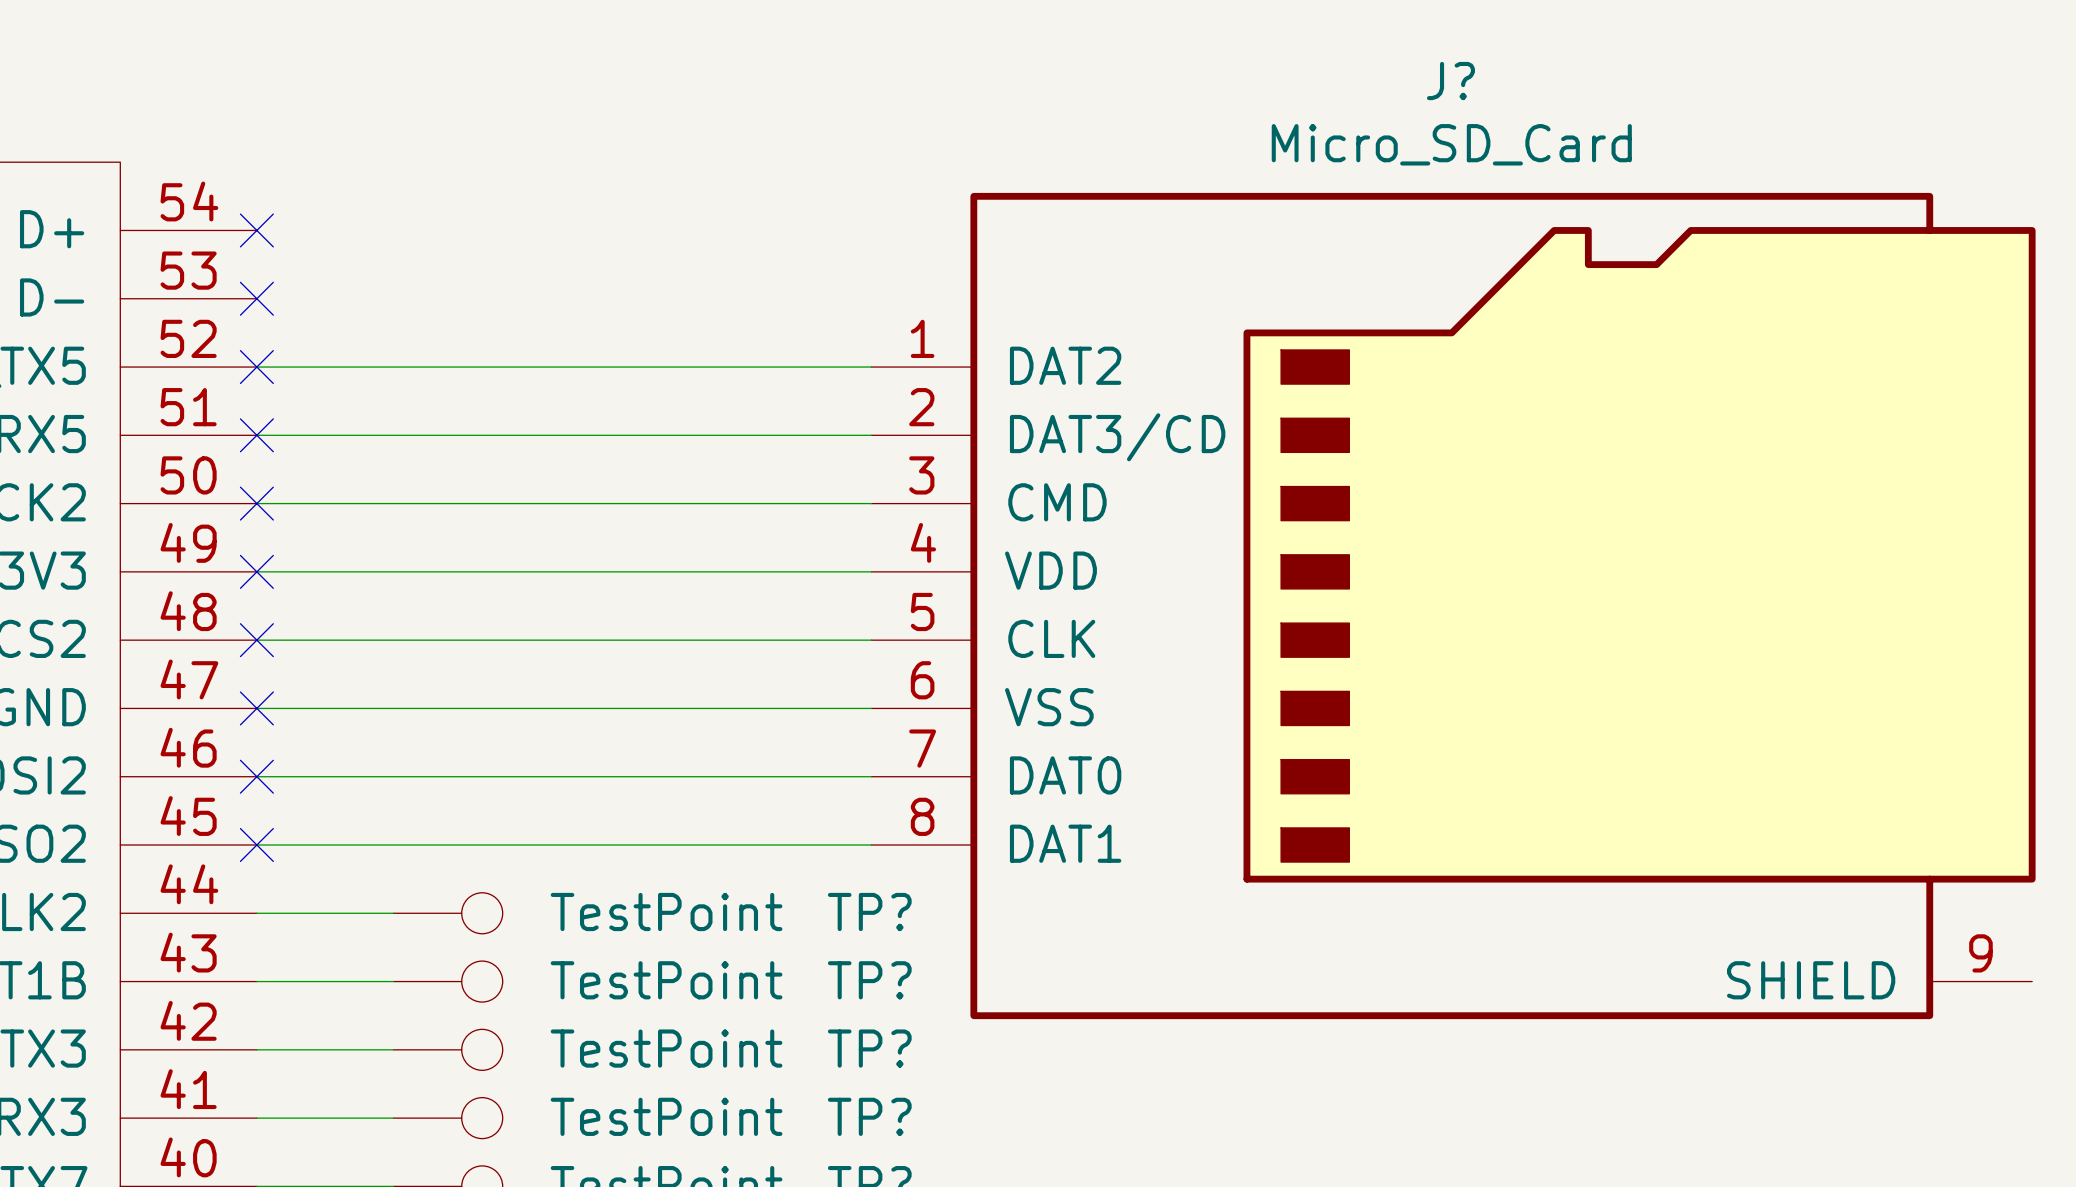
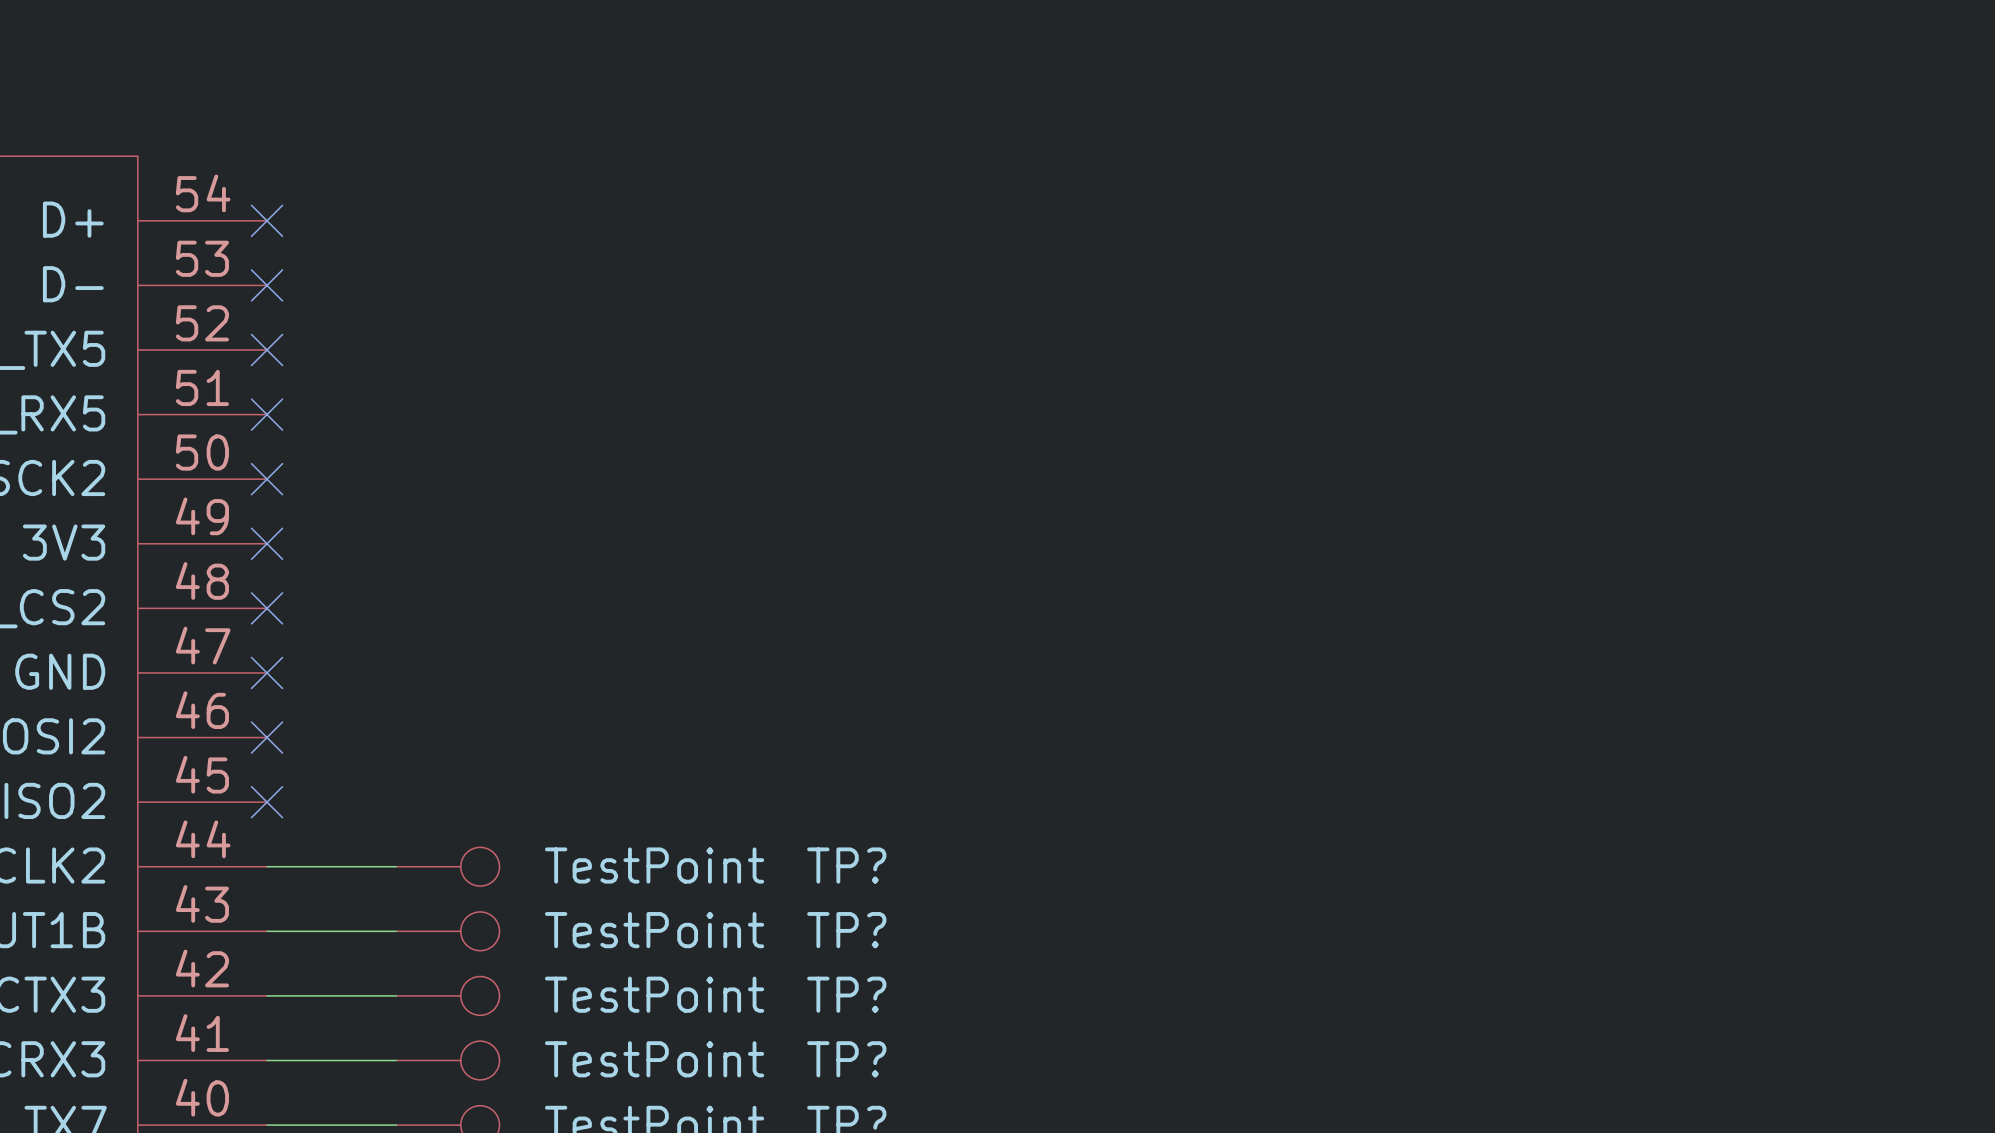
wire: (256, 367) (871, 367) -> none
wire: (256, 435) (871, 435) -> none
wire: (256, 503) (871, 503) -> none
wire: (256, 571) (871, 571) -> none
J?: Micro_SD_Card (1453, 606) -> none
wire: (256, 640) (871, 640) -> none
wire: (256, 708) (871, 708) -> none
wire: (256, 776) (871, 776) -> none
wire: (256, 845) (871, 845) -> none

